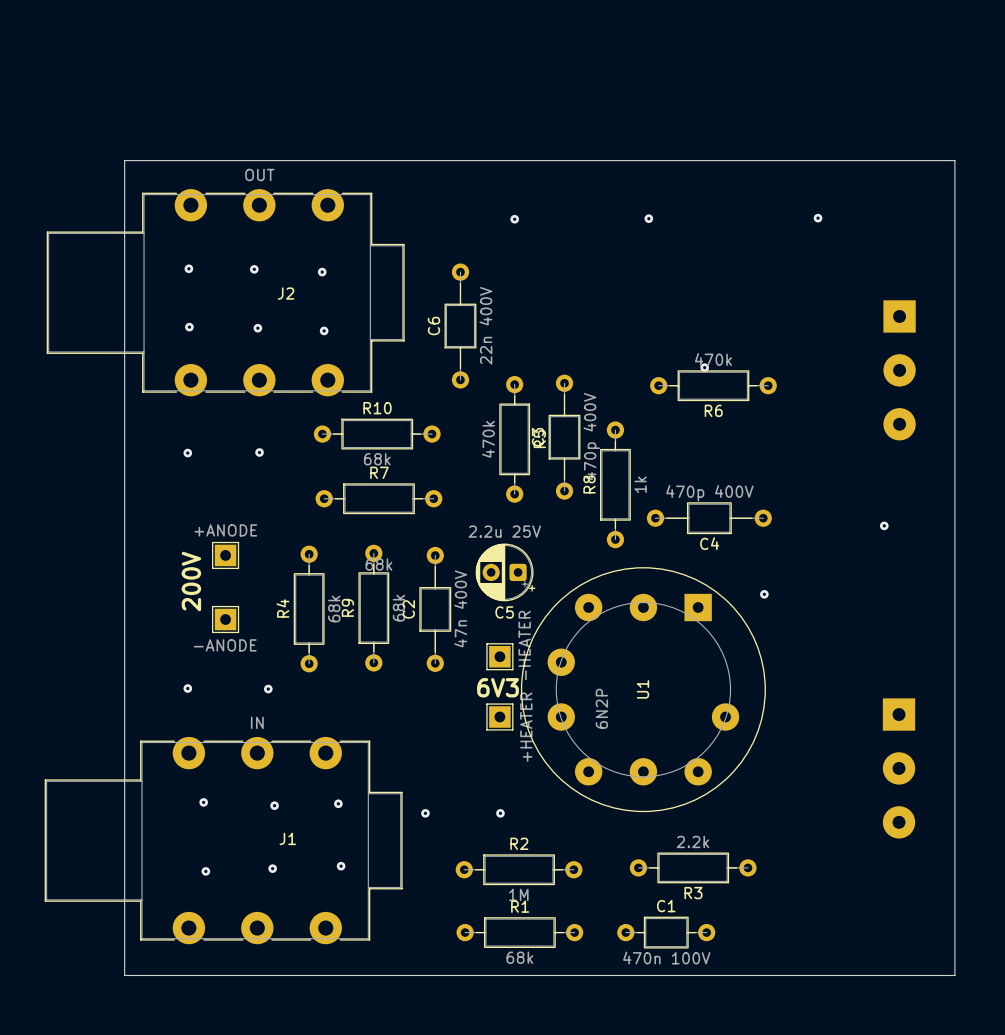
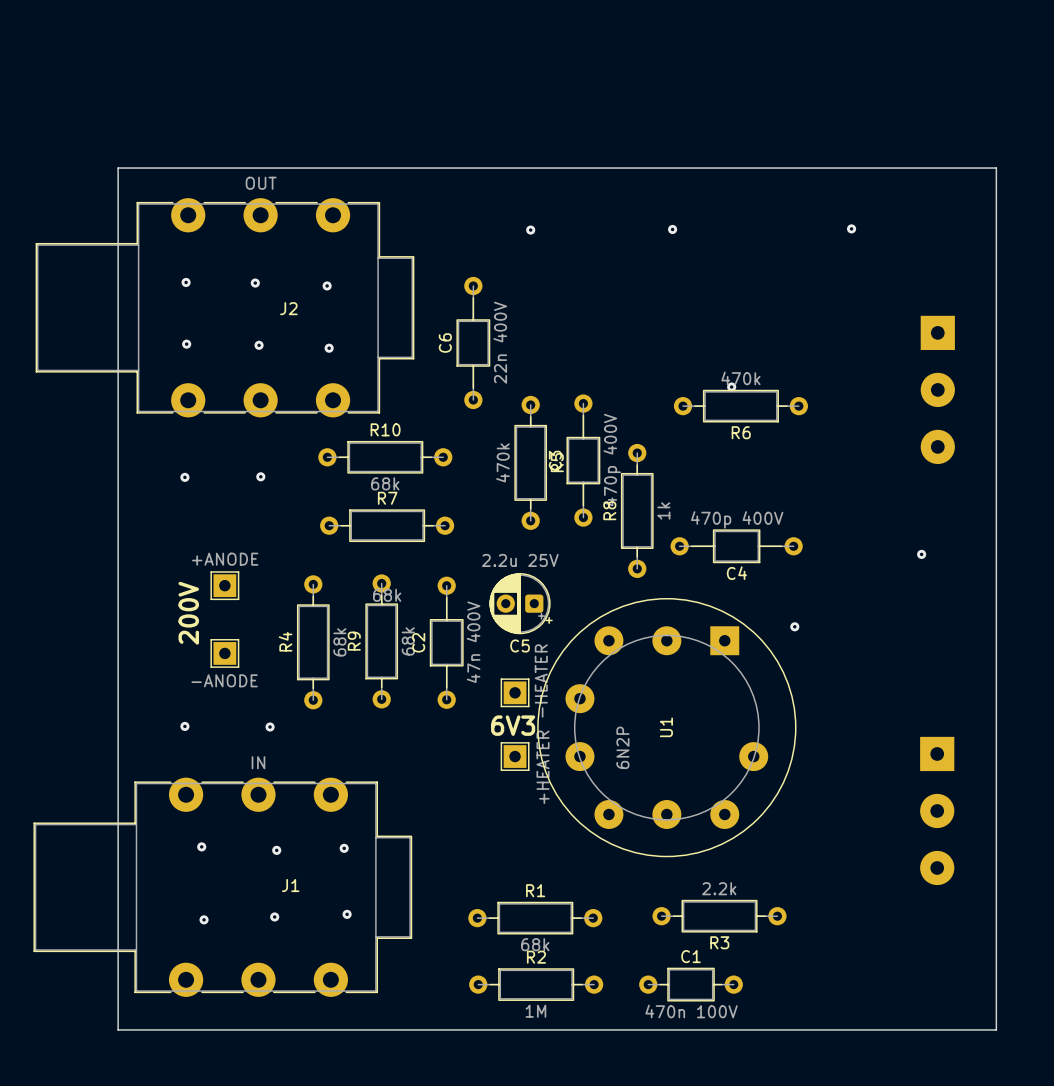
via: (425, 813) -> none
via: (500, 813) -> none
R2 name: R2 (519, 843) -> R1 (535, 890)
R2 value: 1M (518, 894) -> 68k (535, 944)
R1 name: R1 (520, 906) -> R2 (536, 957)
R1 value: 68k (519, 957) -> 1M (535, 1011)

